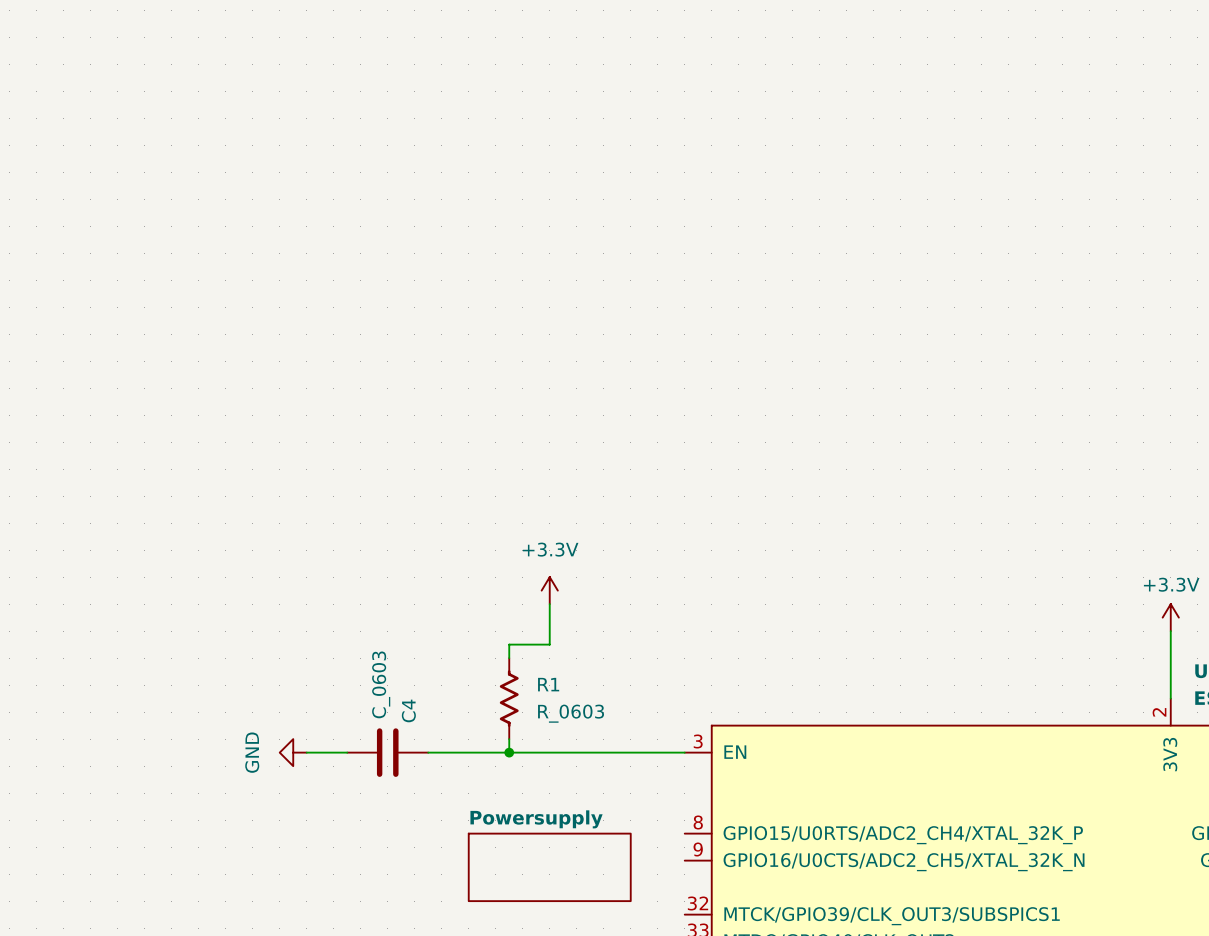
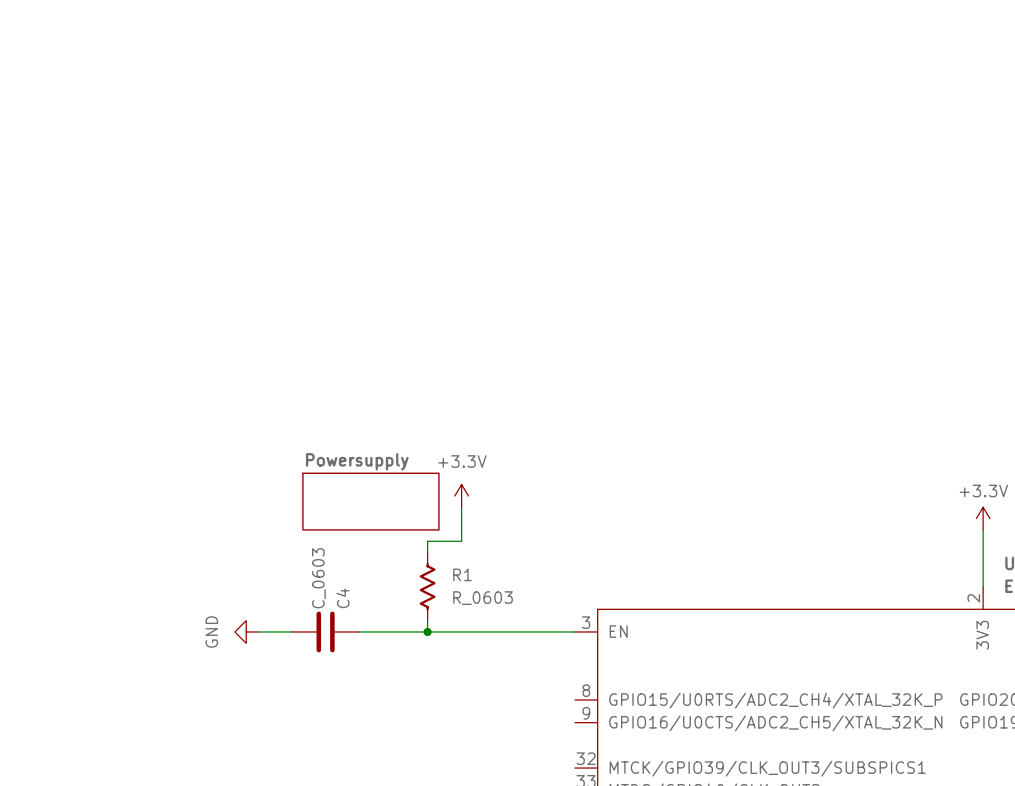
sheet Powersupply: none -> (370, 501)
sheet Powersupply: (549, 867) -> none

